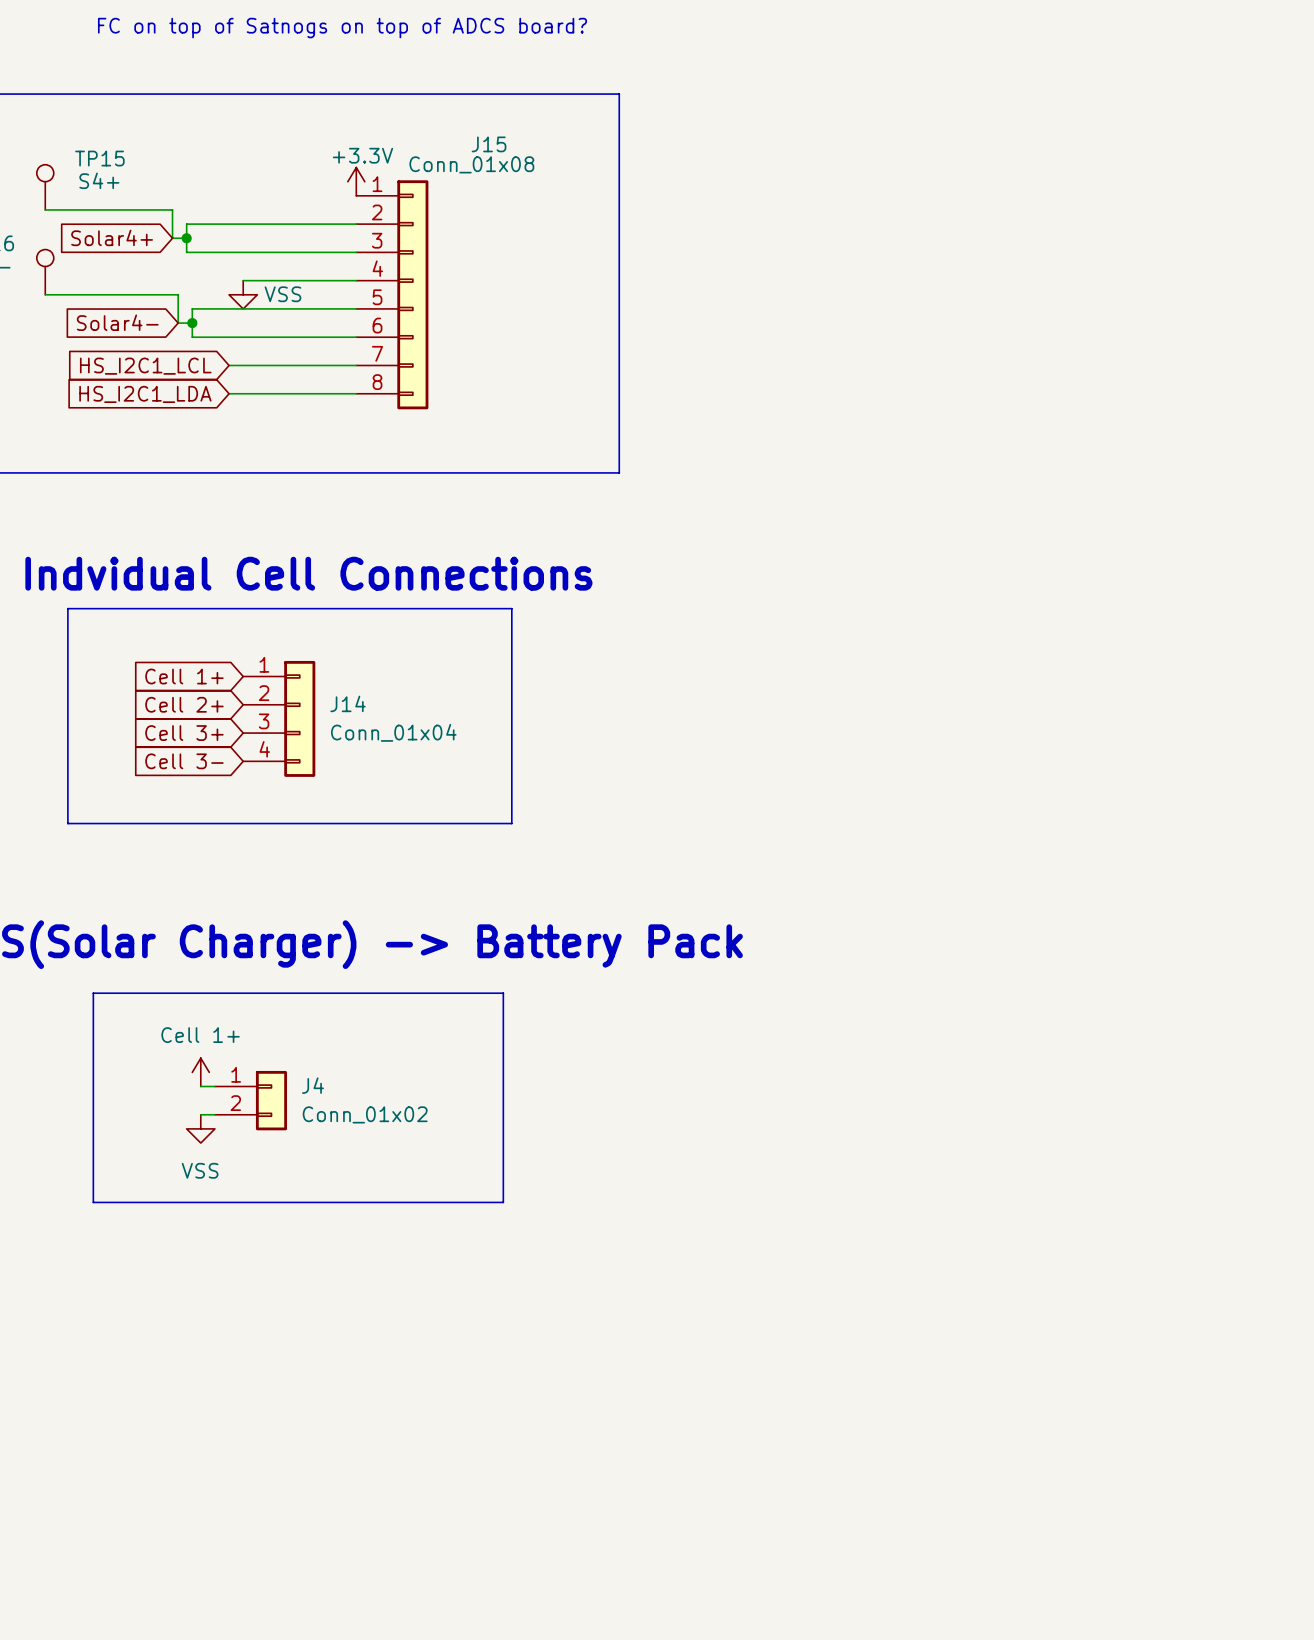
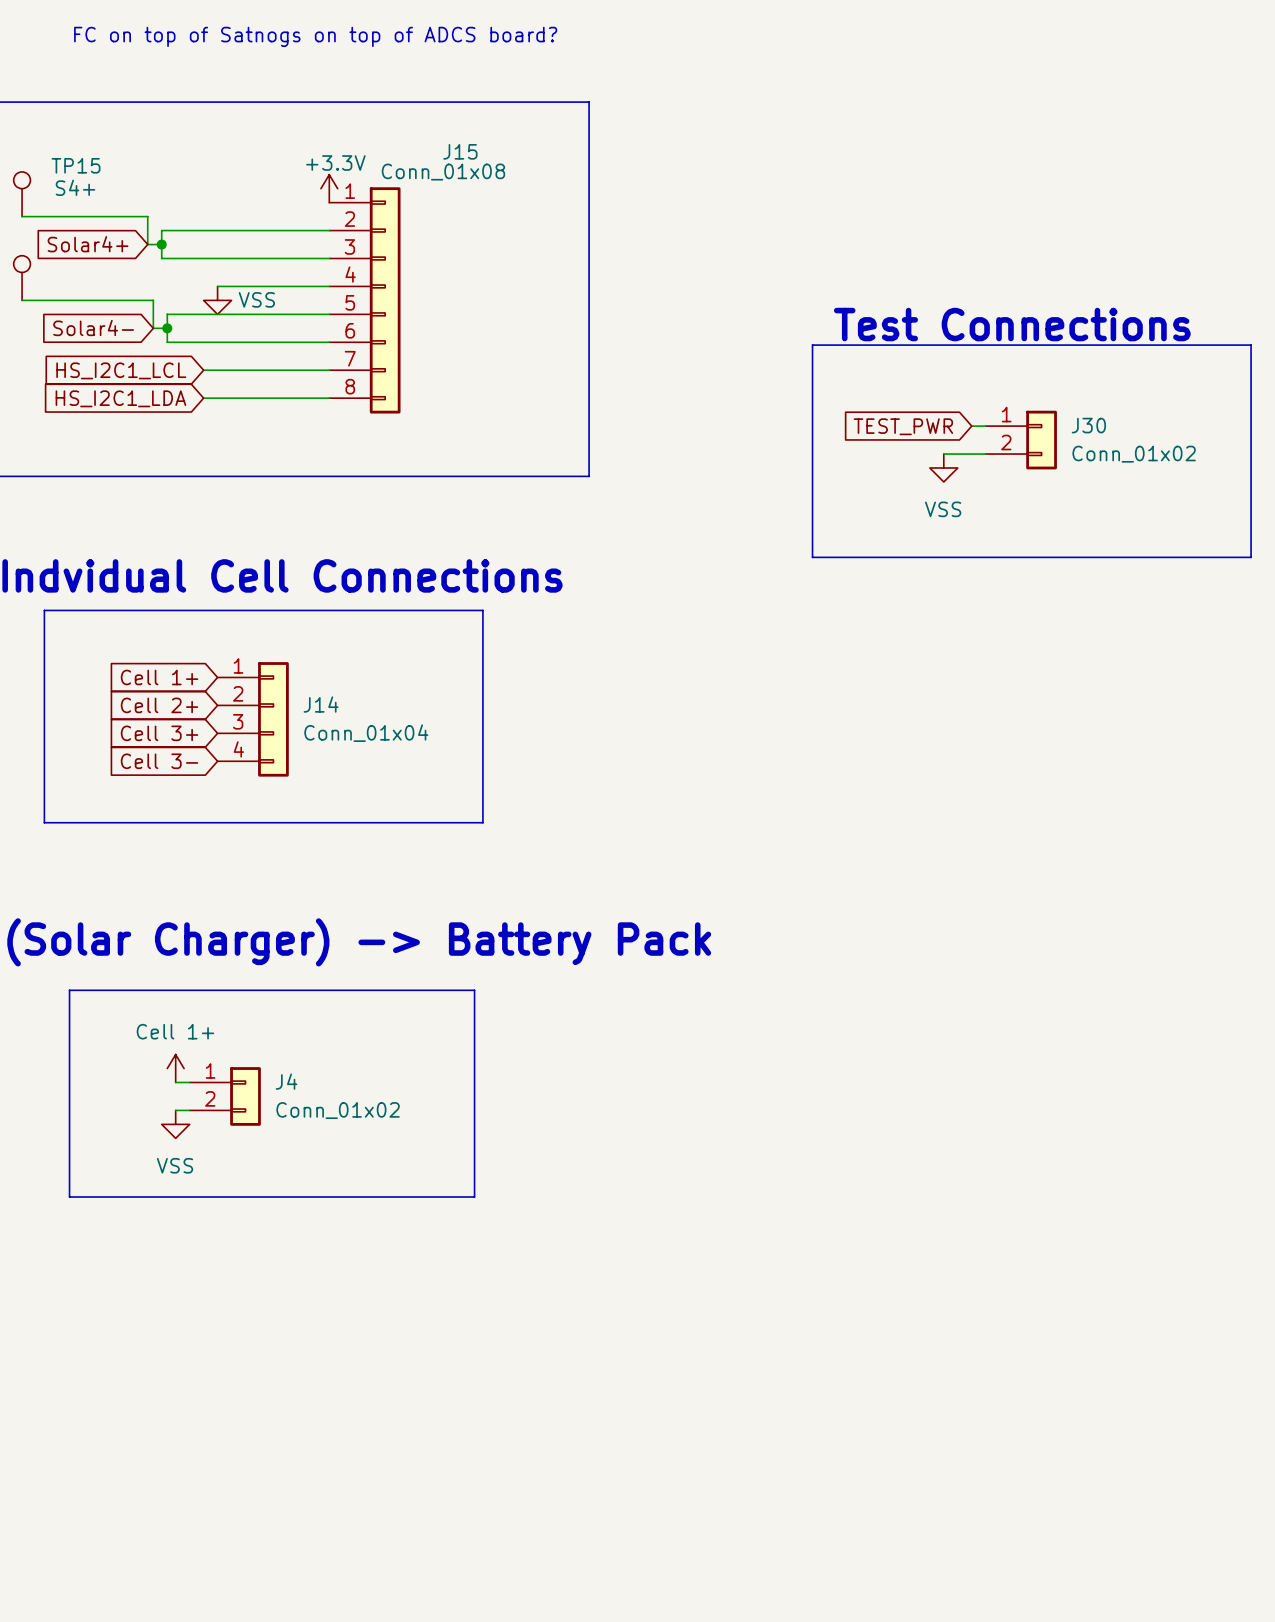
text: none -> Test Connections (1012, 324)
line: none -> (812, 345) (1251, 345) (1251, 557) (812, 557) (812, 345)
global label: none -> TEST_PWR (903, 426)
wire: none -> (971, 426) (985, 426)
J30: none -> Conn_01x02 (1021, 440)
wire: none -> (943, 454) (985, 454)
power symbol: none -> VSS (943, 467)

